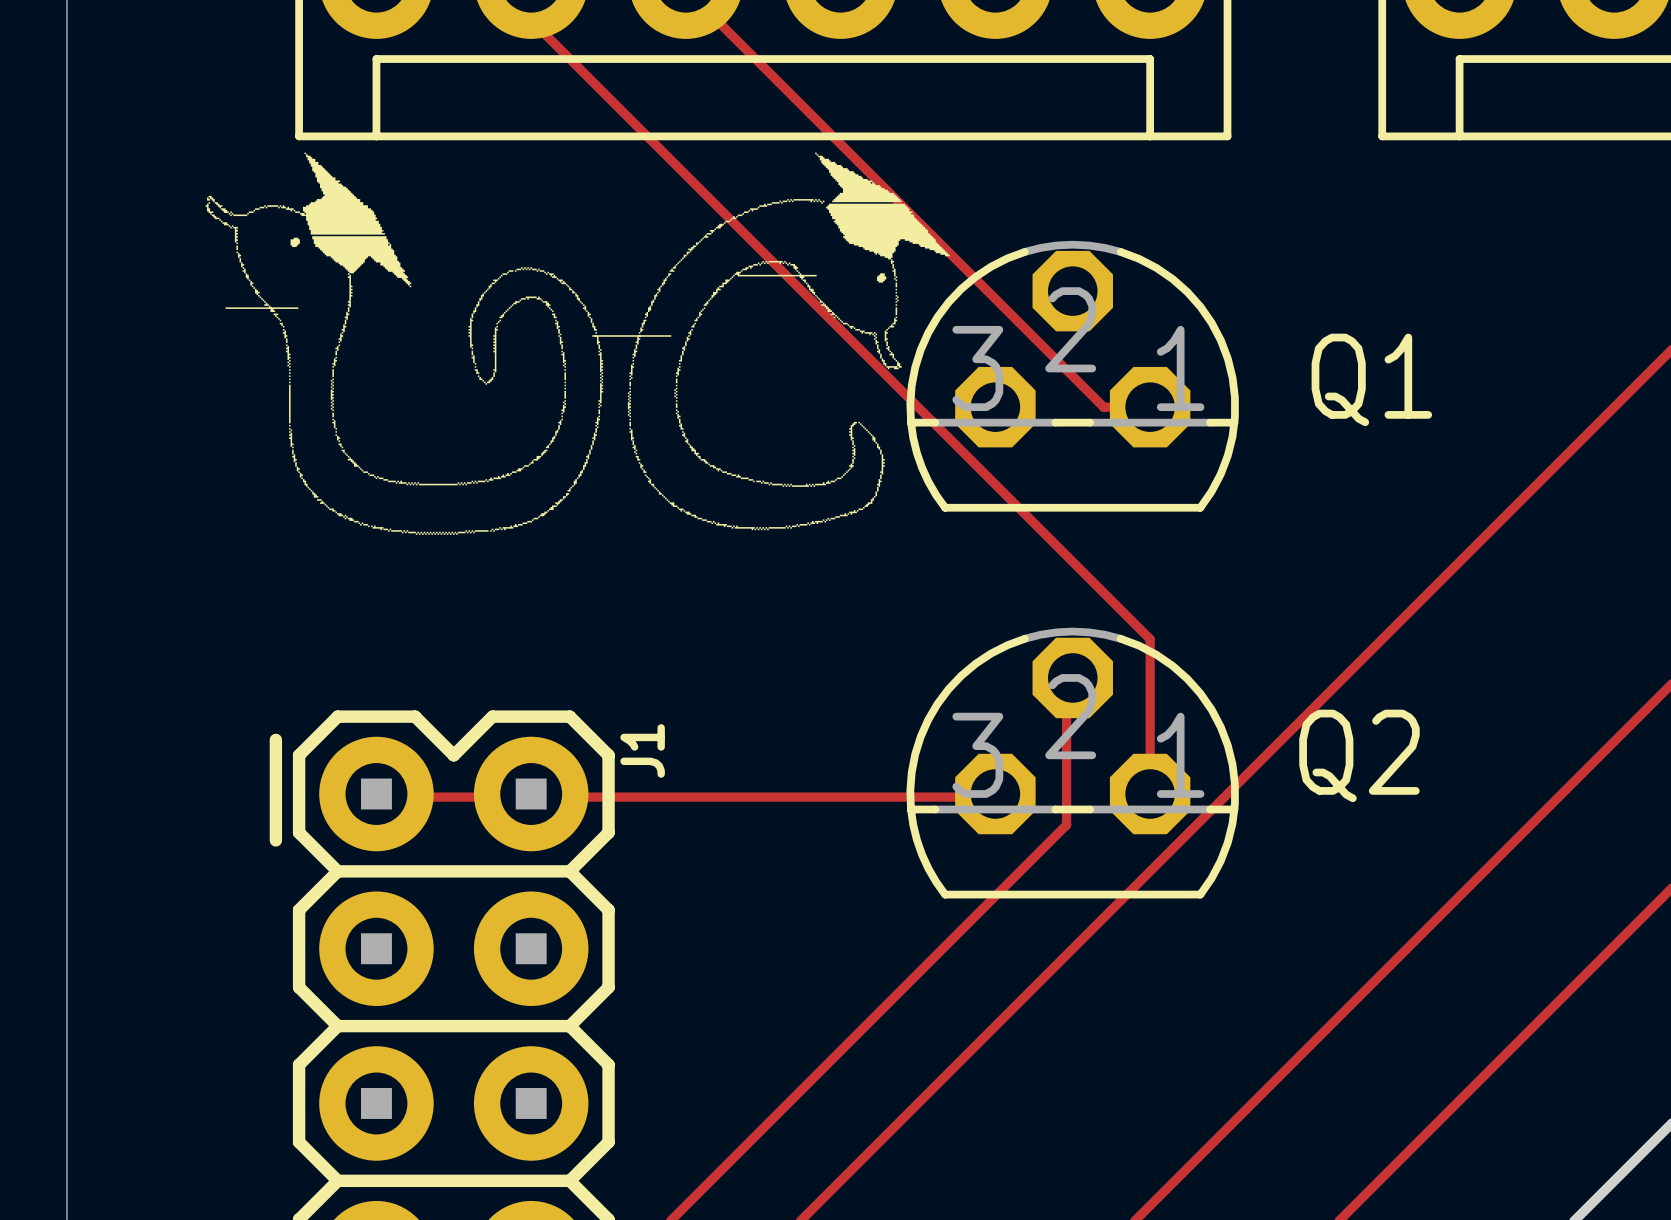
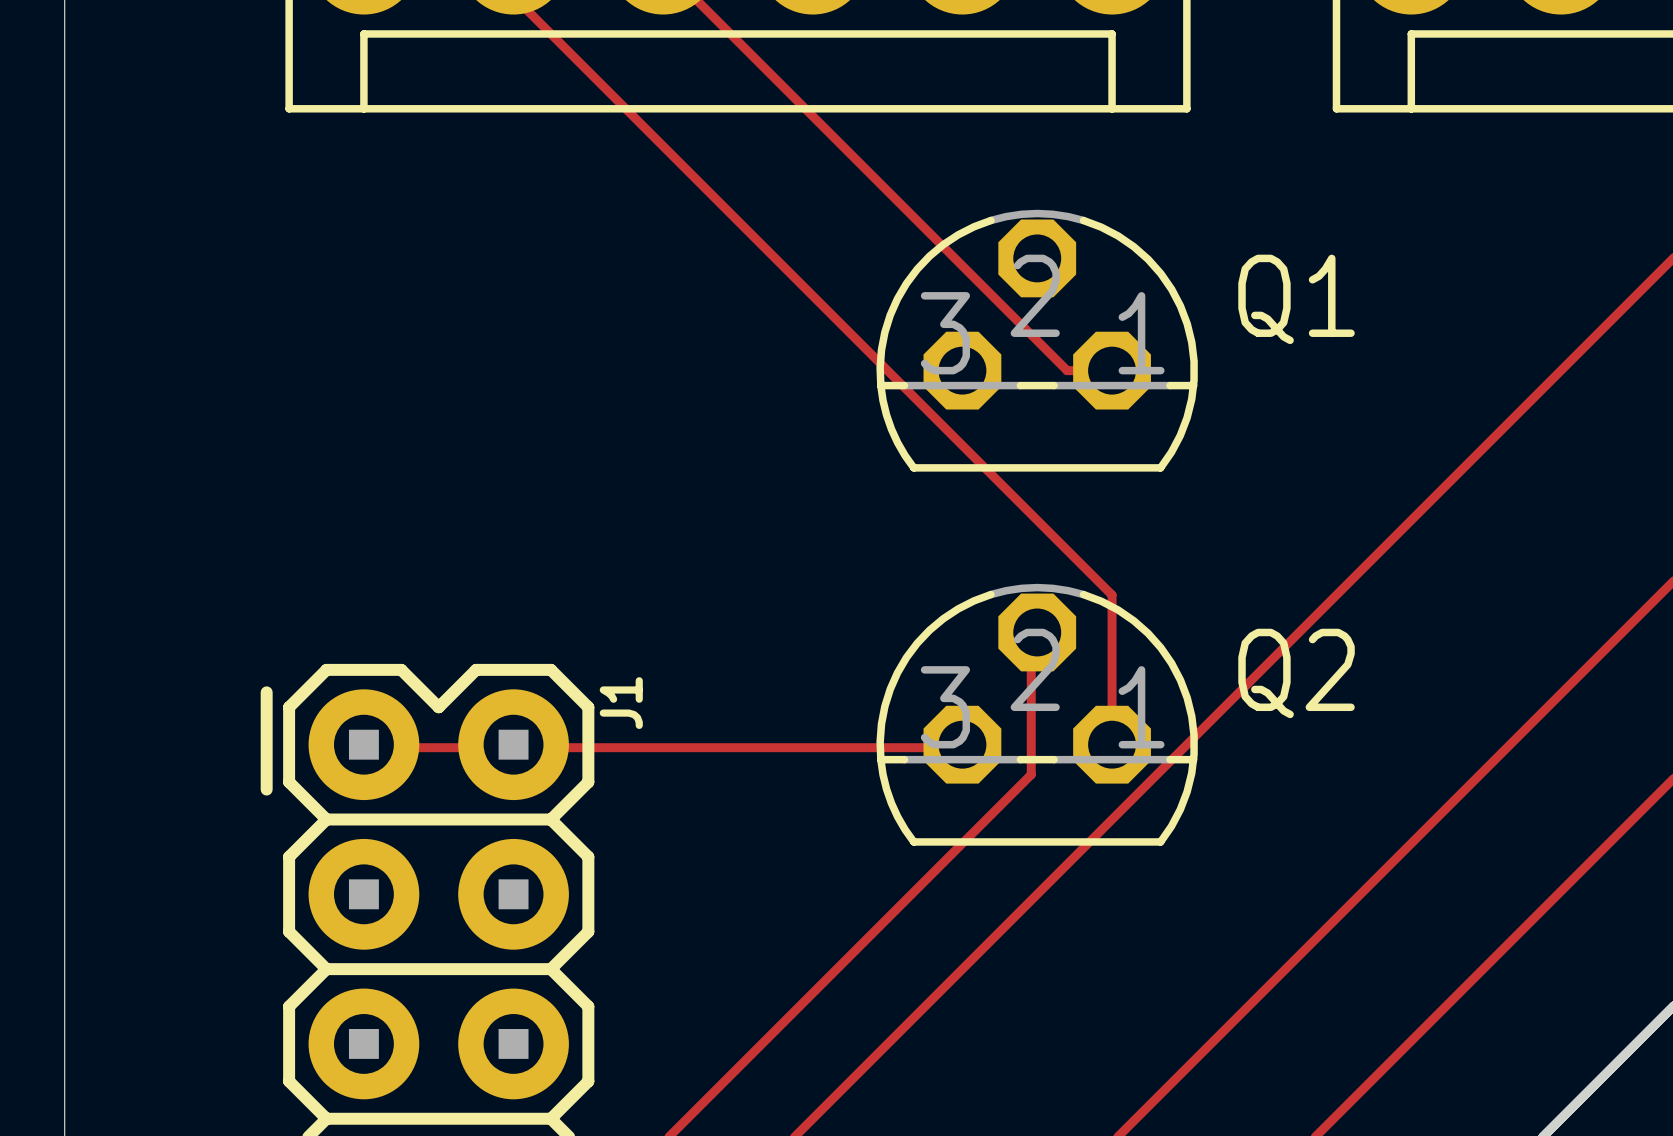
drawing: [205, 152, 950, 535] -> none
Q1 name position: Q1 (1371, 379) -> Q1 (1296, 299)
Q2 name position: Q2 (1359, 755) -> Q2 (1296, 673)

